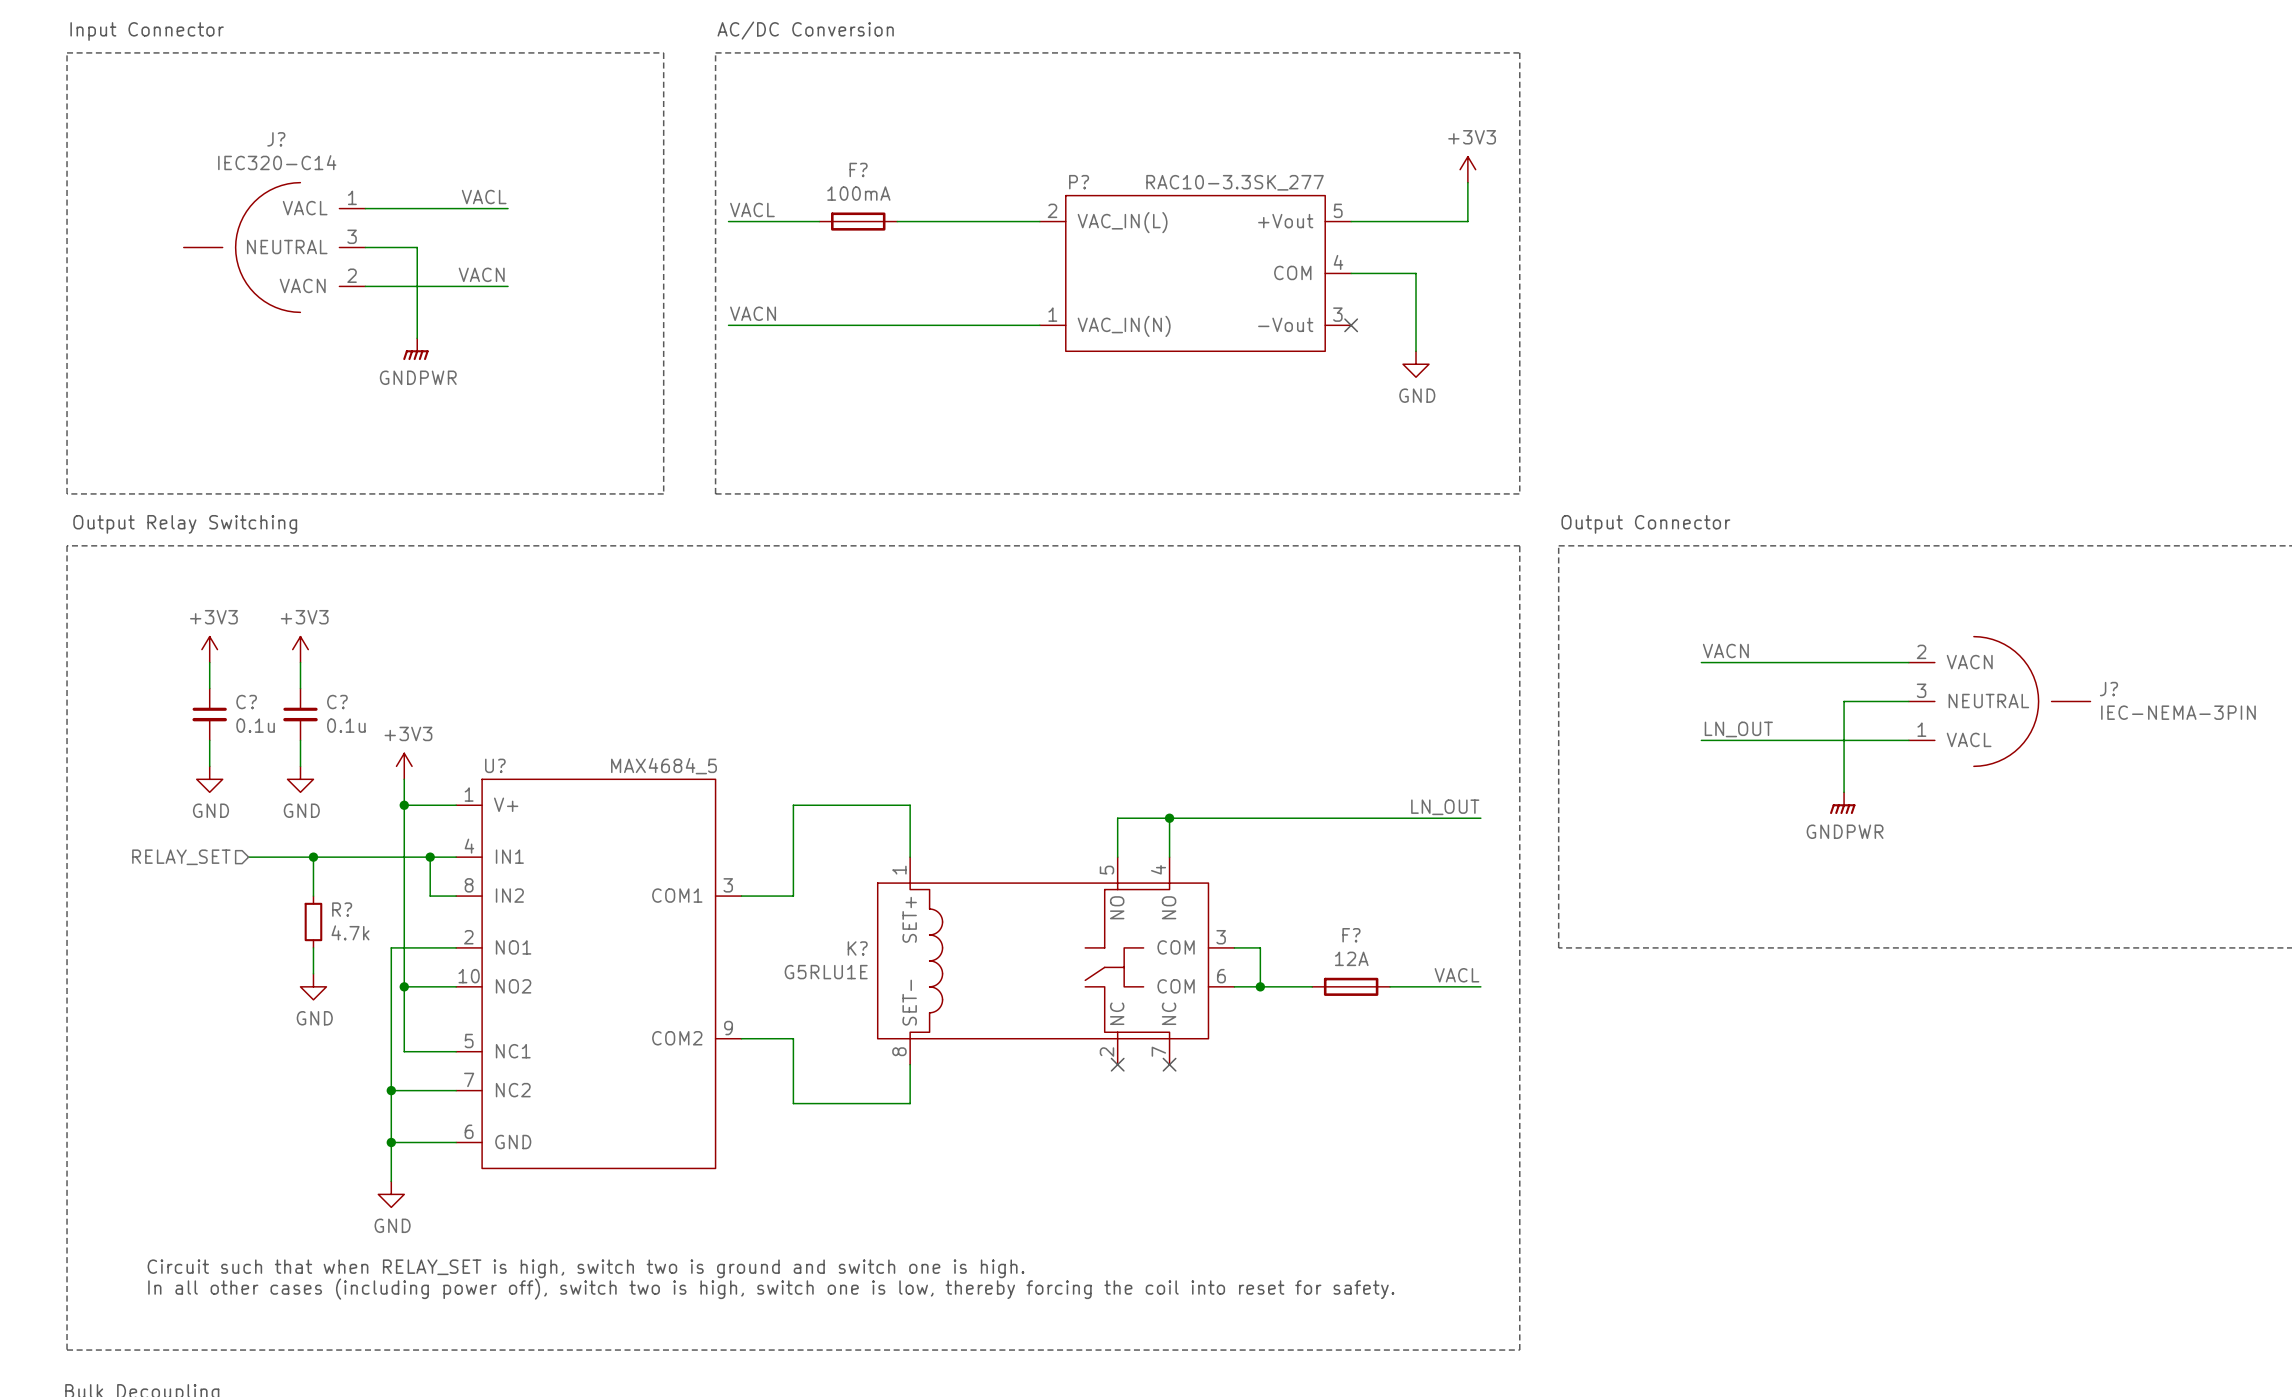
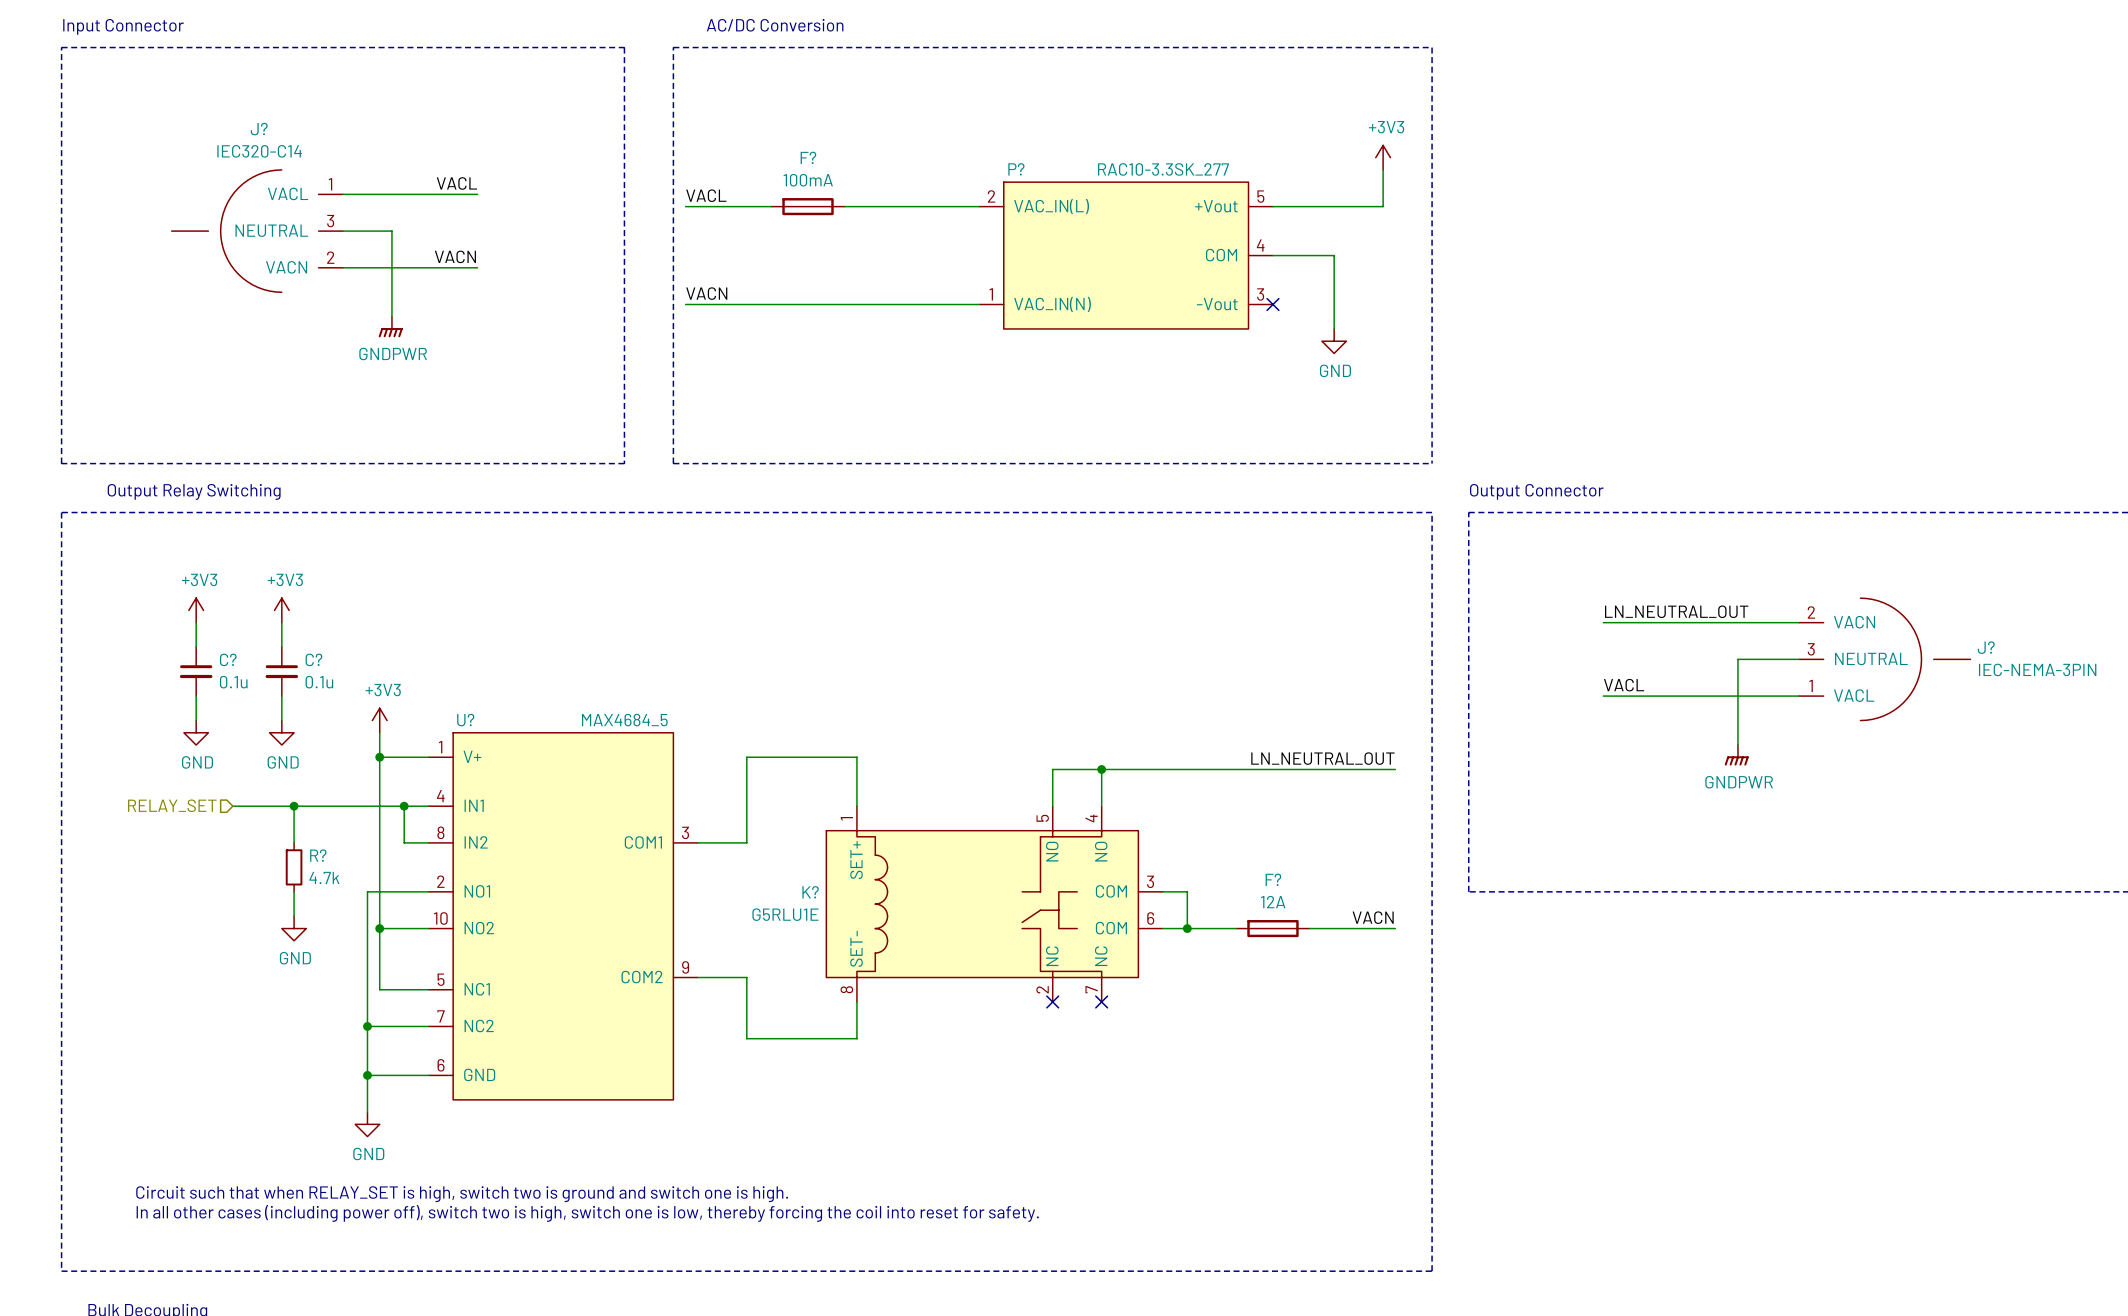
label: VACN (1725, 651) -> LN_NEUTRAL_OUT (1676, 611)
label: LN_OUT (1738, 729) -> VACL (1624, 685)
label: LN_OUT (1445, 807) -> LN_NEUTRAL_OUT (1322, 758)
label: VACL (1456, 975) -> VACN (1373, 917)

